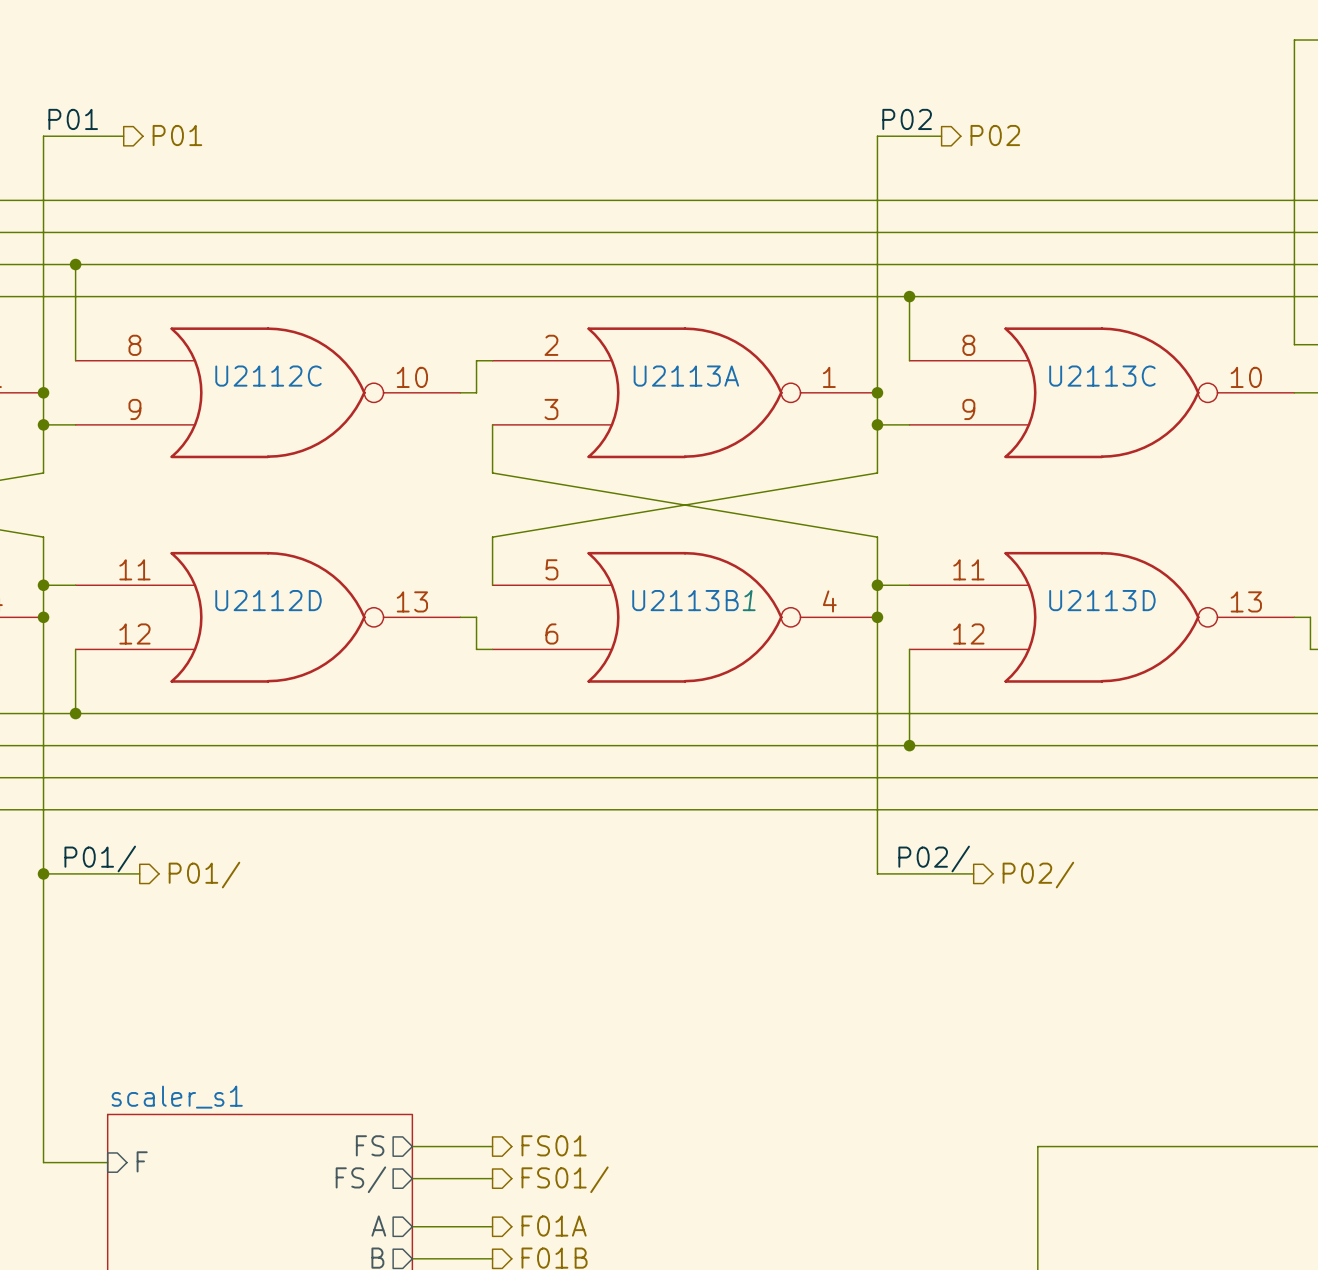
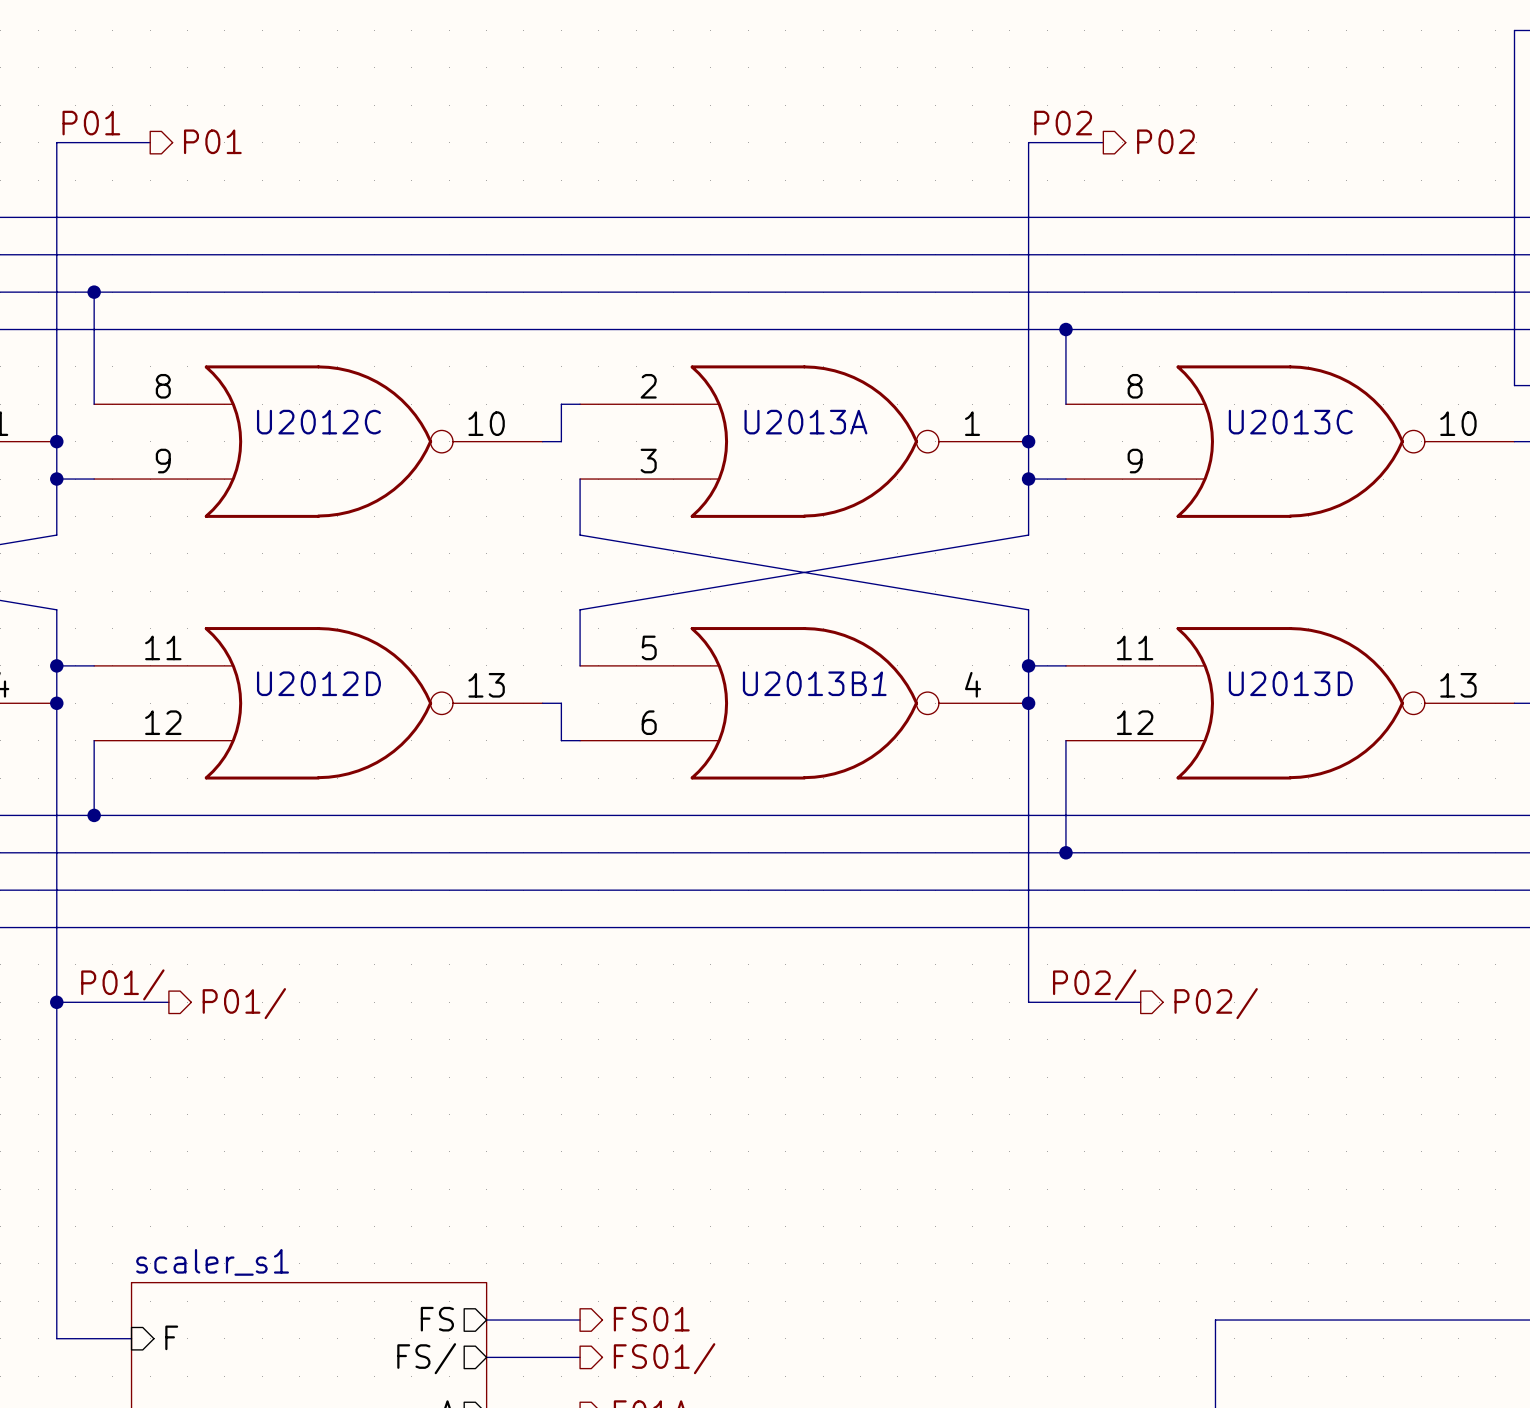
U2112C name: U2112C (268, 376) -> U2012C (318, 422)
U2113A name: U2113A (686, 376) -> U2013A (805, 422)
U2113C name: U2113C (1102, 376) -> U2013C (1290, 422)
U2112D name: U2112D (268, 600) -> U2012D (318, 683)
U2113B name: U2113B (685, 600) -> U2013B (804, 683)
U2113D name: U2113D (1102, 600) -> U2013D (1290, 683)

